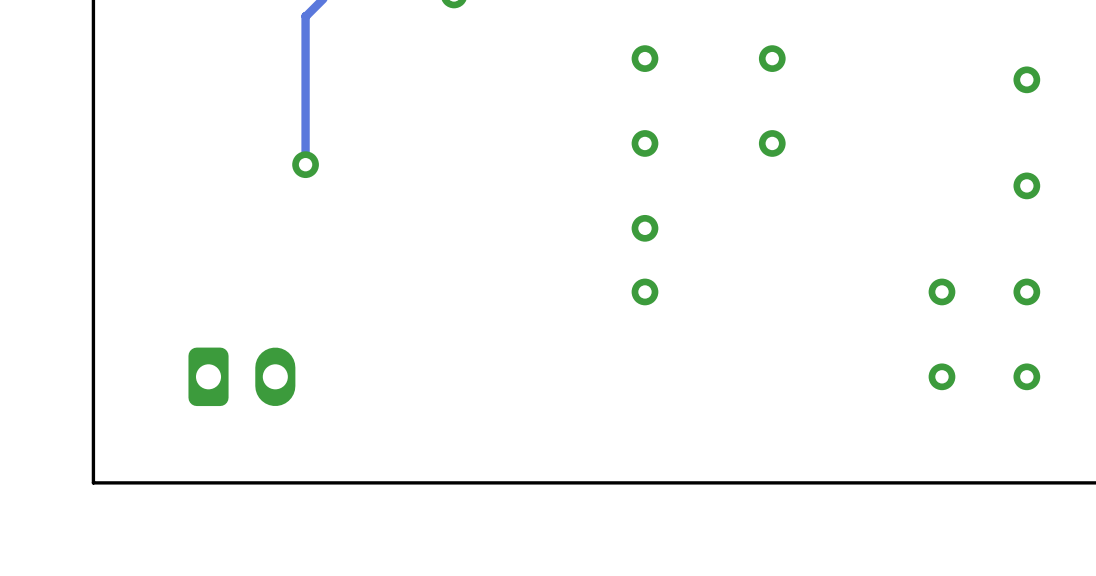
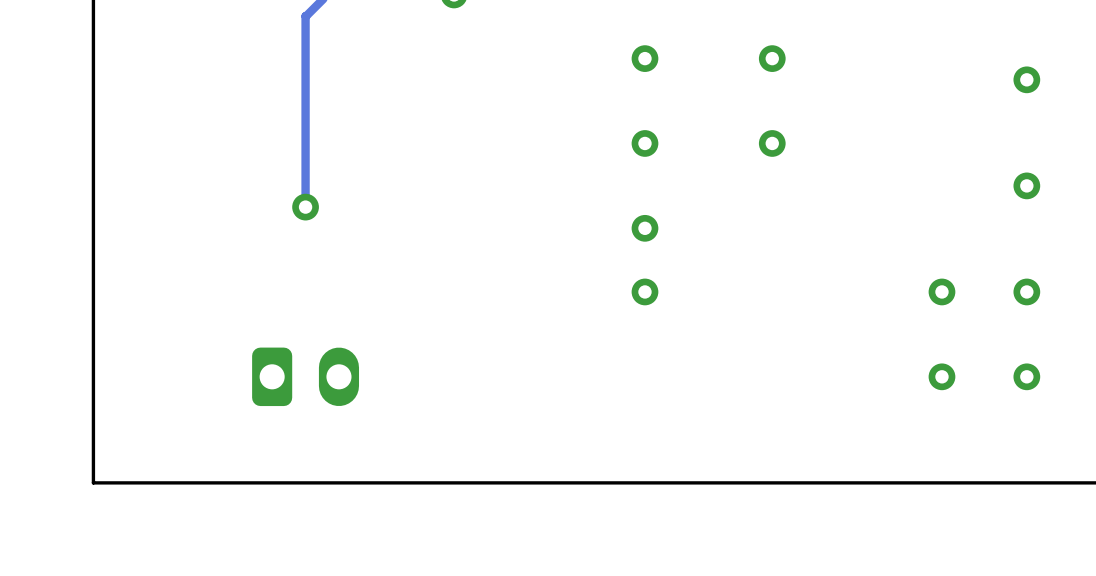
track: none -> (305, 164) (305, 207)
via position: (305, 164) -> (305, 207)
part position: (241, 376) -> (305, 376)

